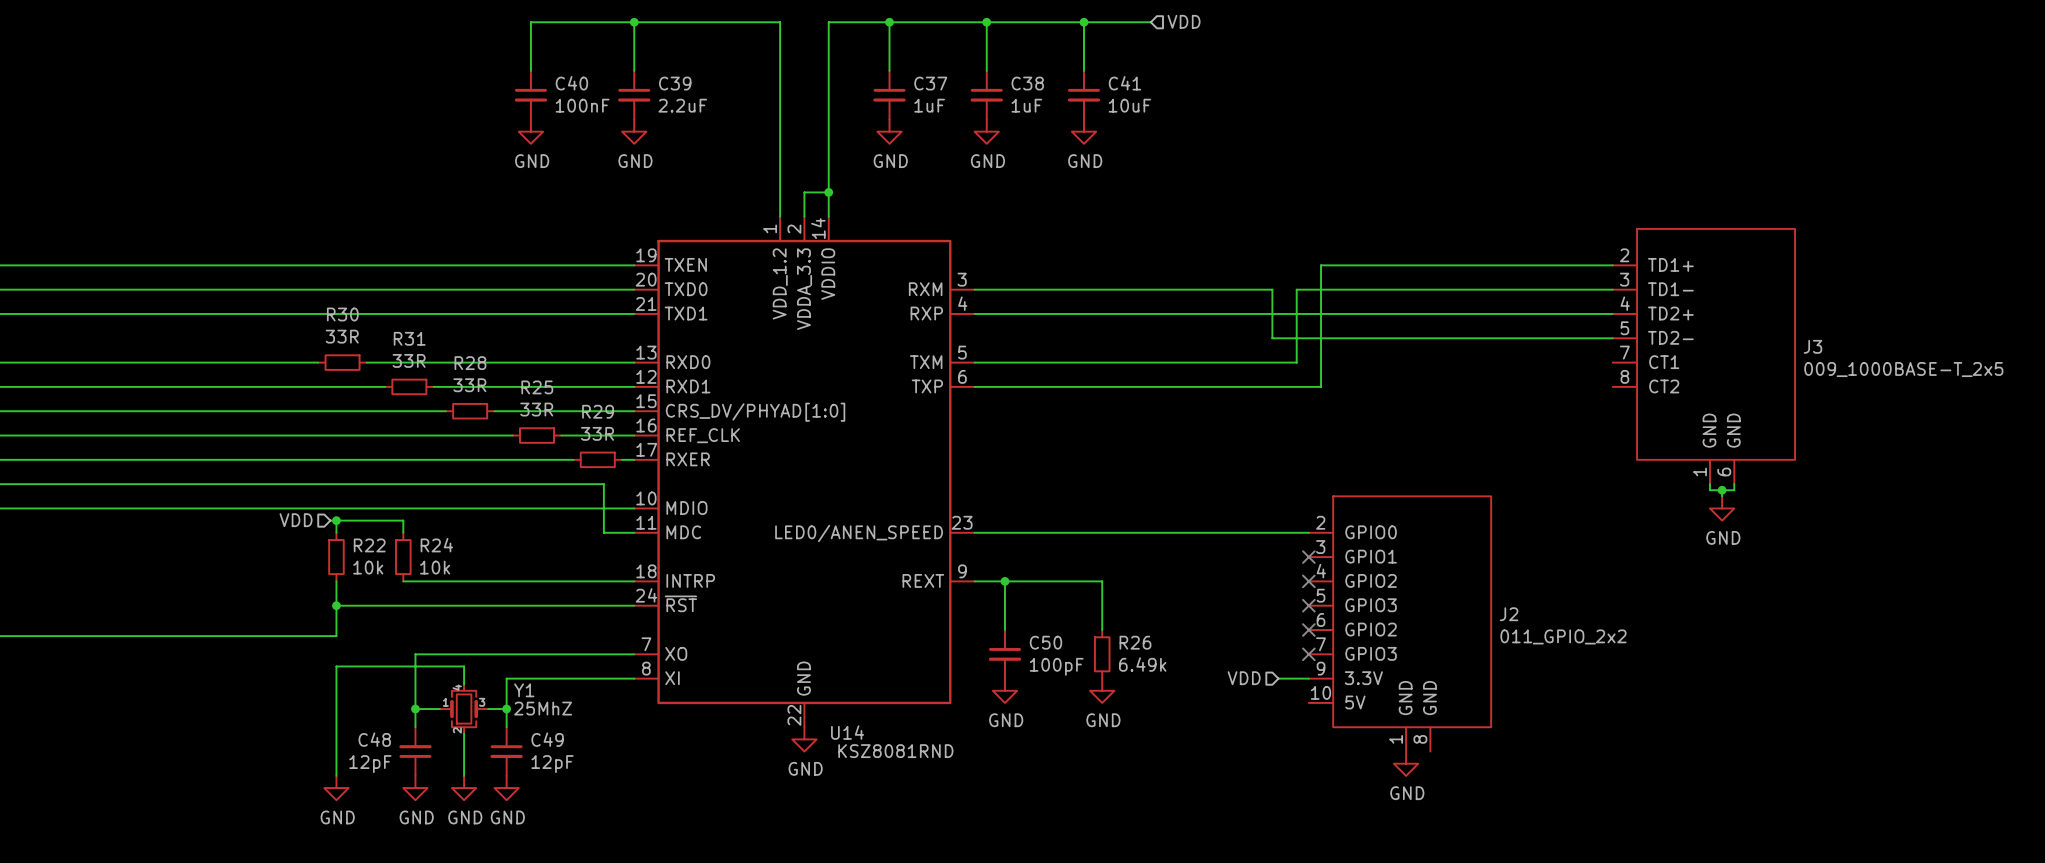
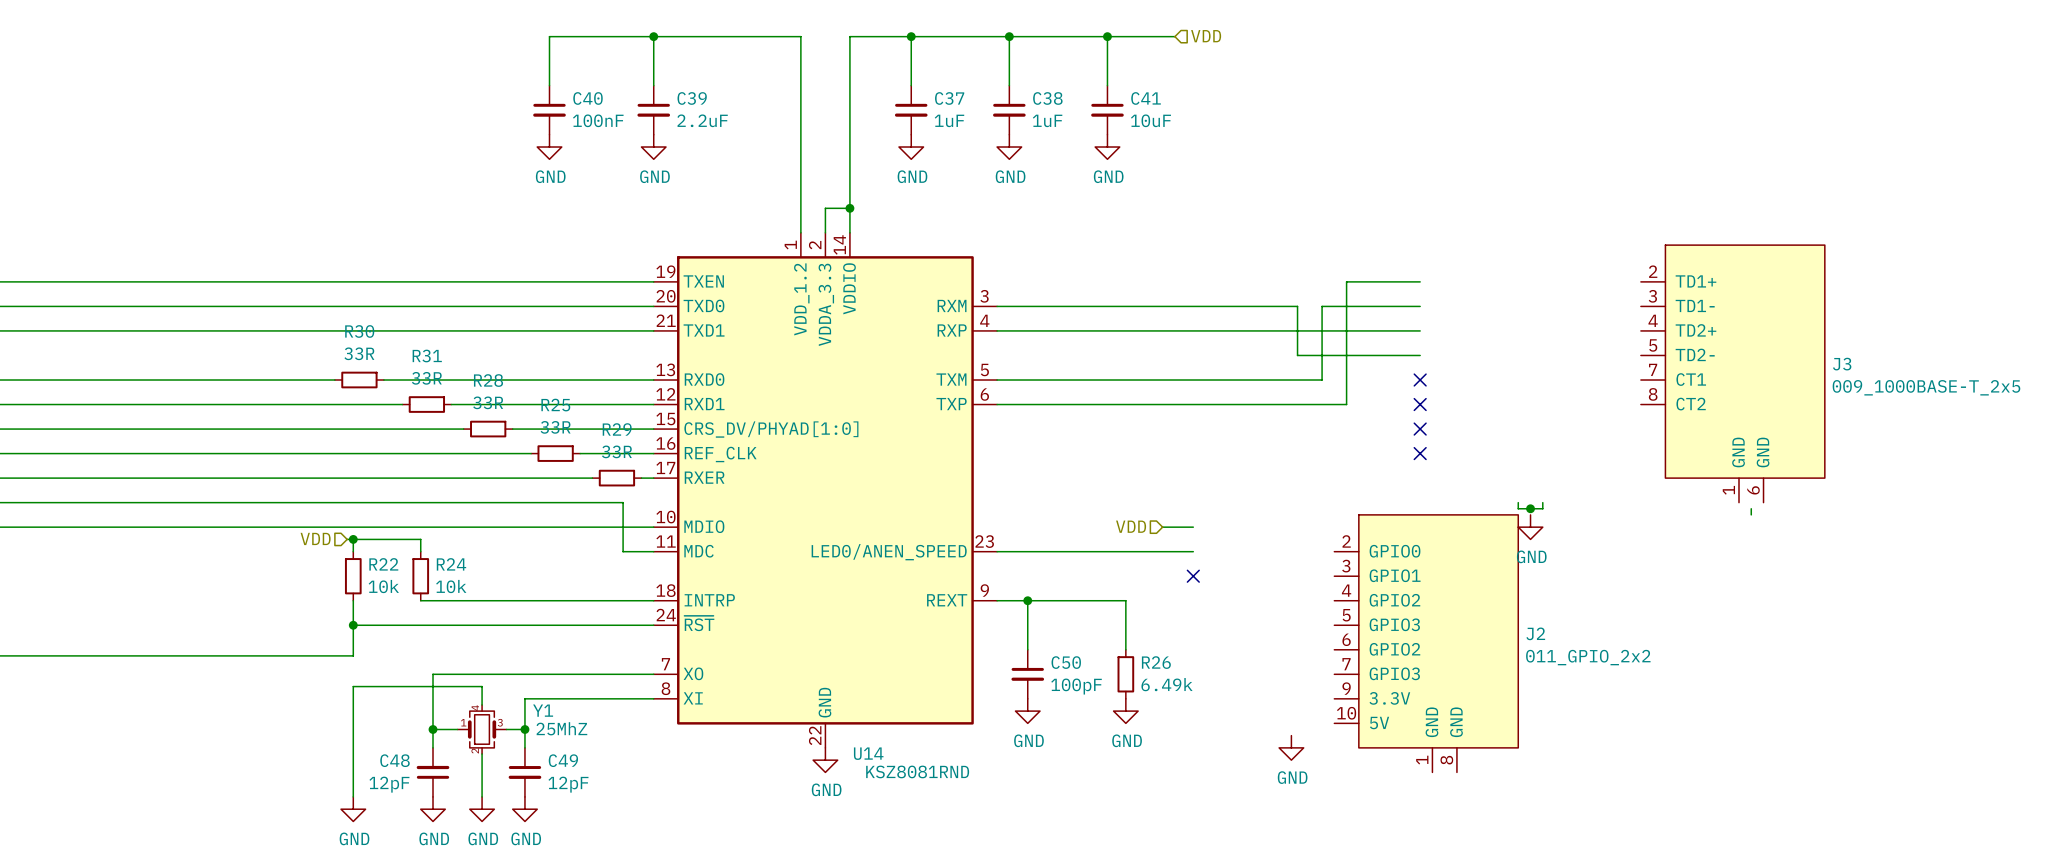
wire: (1393, 265) (1612, 265) -> none
wire: (1393, 289) (1612, 289) -> none
wire: (1393, 313) (1612, 313) -> none
wire: (1393, 338) (1612, 338) -> none
no-connect mark: none -> (1420, 380)
no-connect mark: none -> (1420, 404)
no-connect mark: none -> (1420, 429)
no-connect mark: none -> (1420, 453)
wire: (1709, 484) (1709, 490) (1734, 490) (1734, 484) -> (1518, 502) (1518, 508) (1542, 508) (1542, 502)
junction: none -> (1530, 508)
junction: (1722, 490) -> none
power symbol: none -> GND (1530, 527)
power symbol: GND (1722, 508) -> none
wire: (1169, 532) (1308, 532) -> none
no-connect mark: none -> (1193, 576)
no-connect mark: (1308, 557) -> none
no-connect mark: (1308, 581) -> none
no-connect mark: (1308, 605) -> none
no-connect mark: (1308, 630) -> none
no-connect mark: (1308, 654) -> none
hierarchical label position: VDD (1244, 678) -> VDD (1131, 526)
wire: (1278, 678) (1308, 678) -> (1162, 527) (1193, 527)
power symbol: none -> GND (1291, 747)
power symbol: GND (1406, 763) -> none

